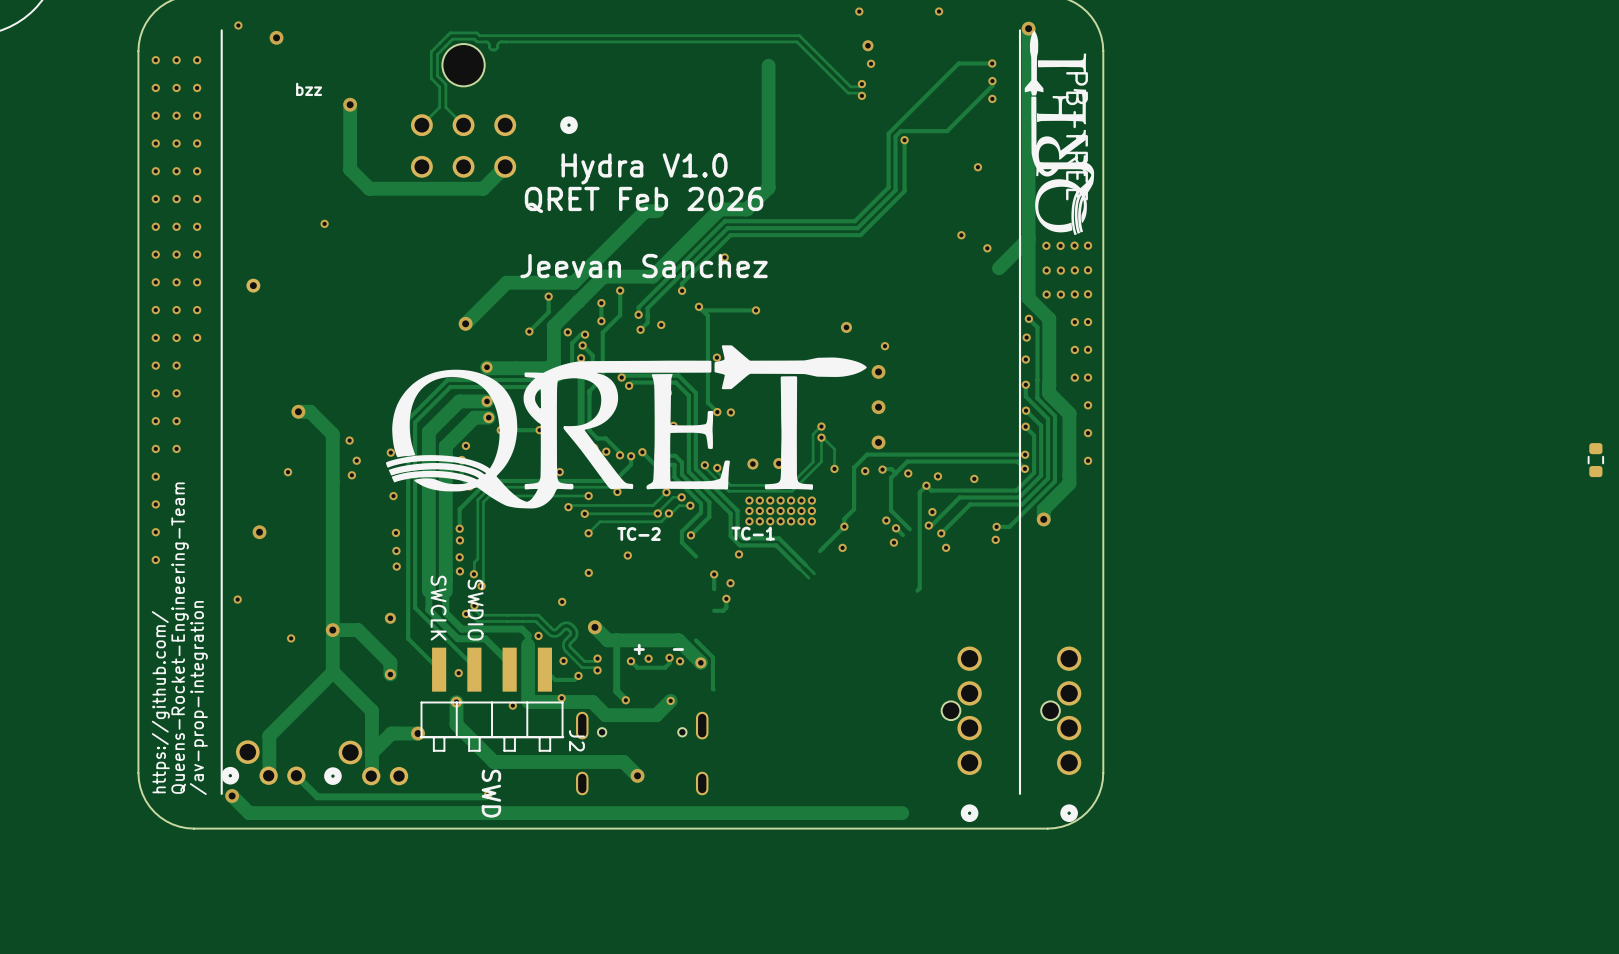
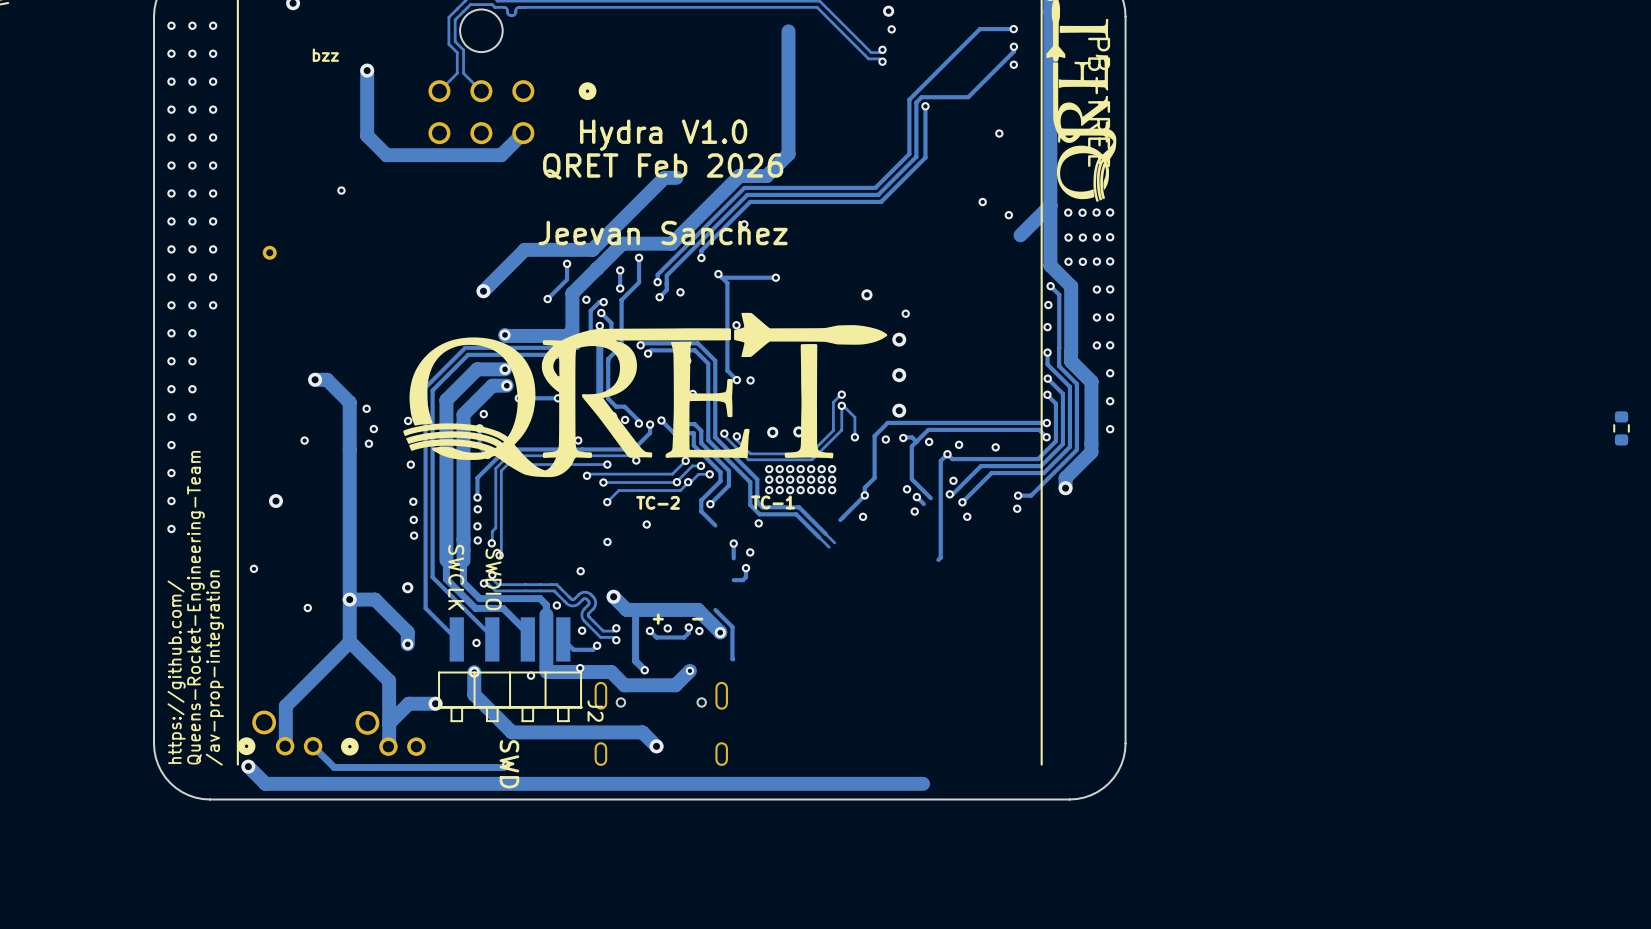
part: (961, 734) -> none
part: (1061, 734) -> none

